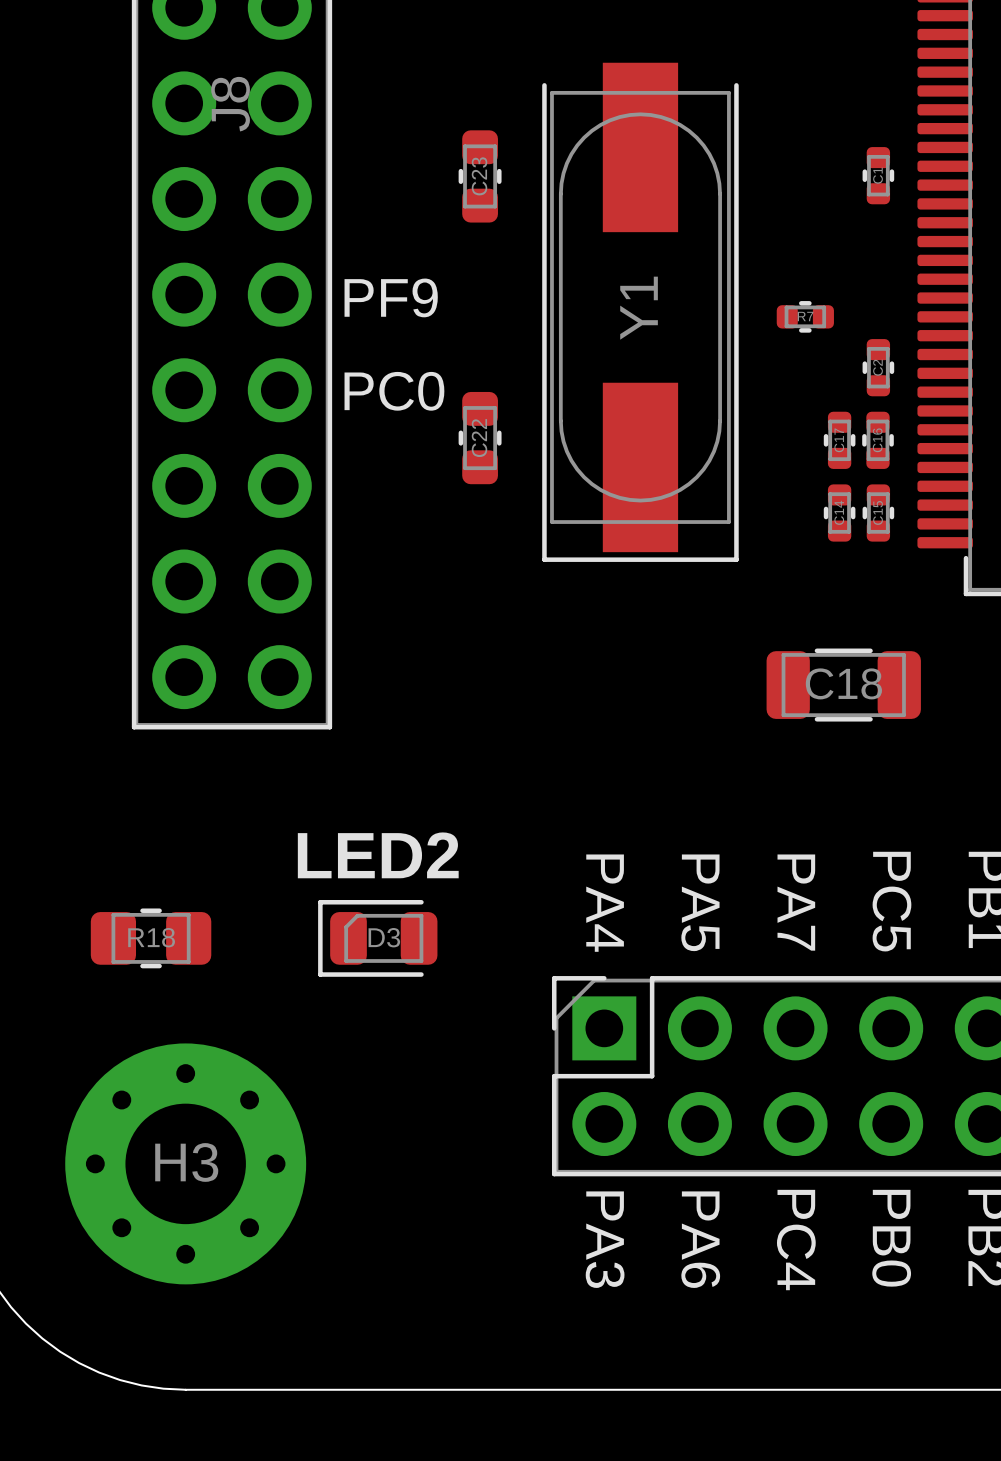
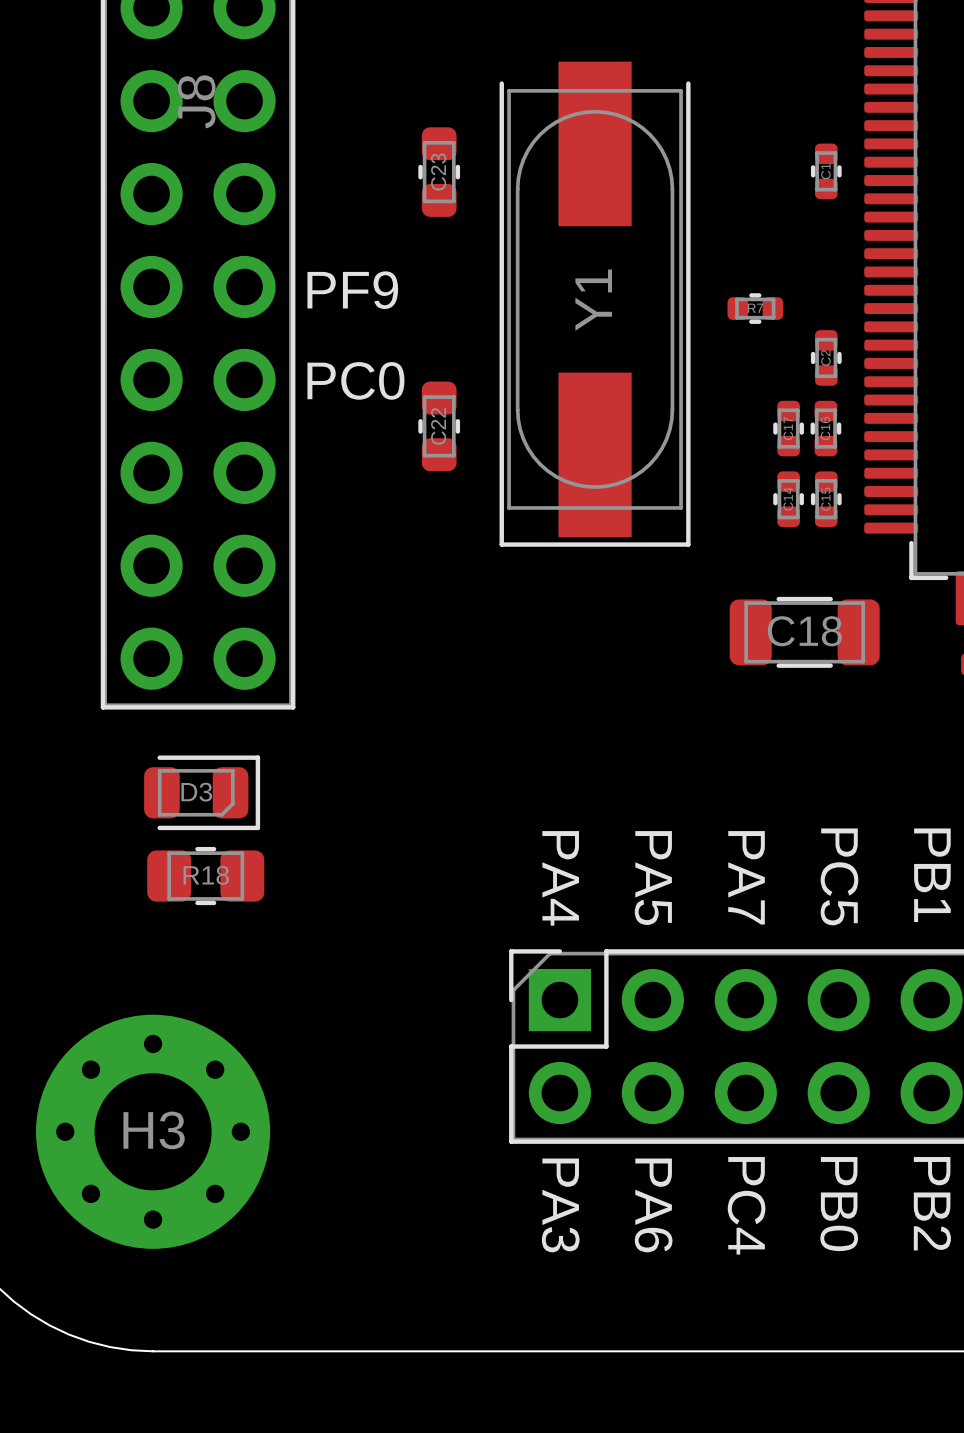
C18 position: (843, 685) -> (804, 632)
text: LED2 (378, 855) -> none
R18 position: (151, 938) -> (205, 876)
D3 rotation: 0° (377, 938) -> 180° (202, 792)
D3 position: (377, 938) -> (202, 792)

